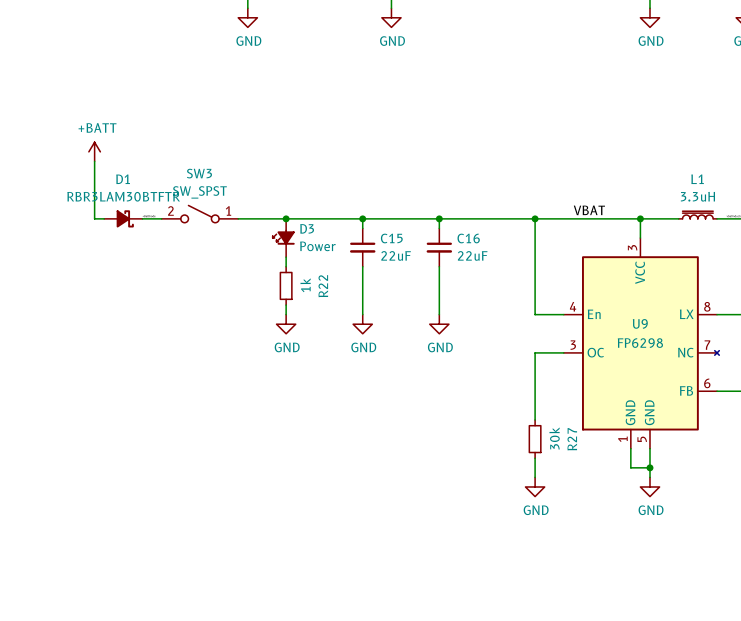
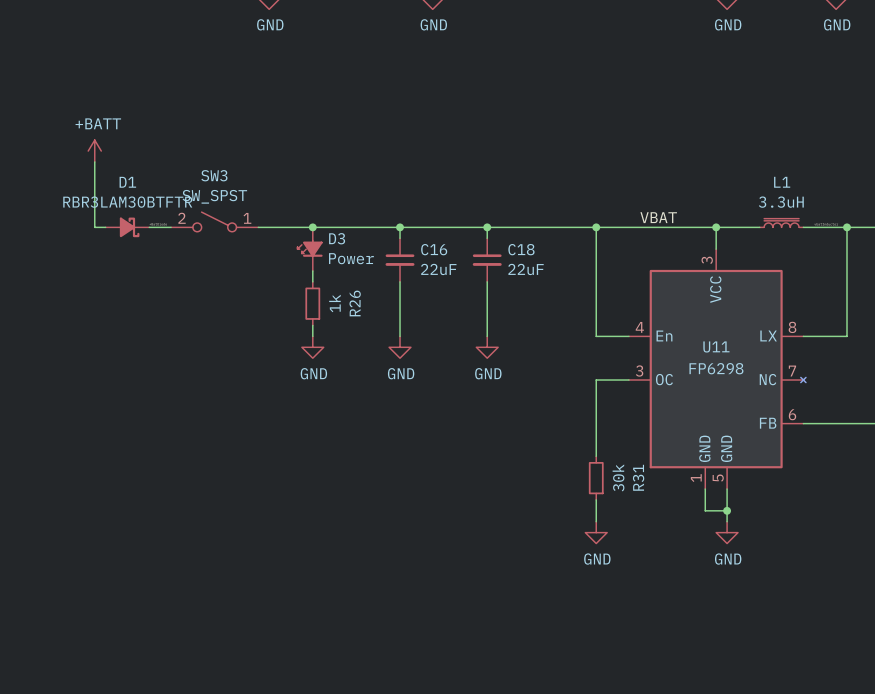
C15 name: C15 (391, 238) -> C16 (434, 249)
C16 name: C16 (468, 238) -> C18 (521, 249)
R22 name: R22 (323, 286) -> R26 (355, 303)
U9 name: U9 (640, 323) -> U11 (716, 346)
R27 name: R27 (572, 439) -> R31 (638, 477)

